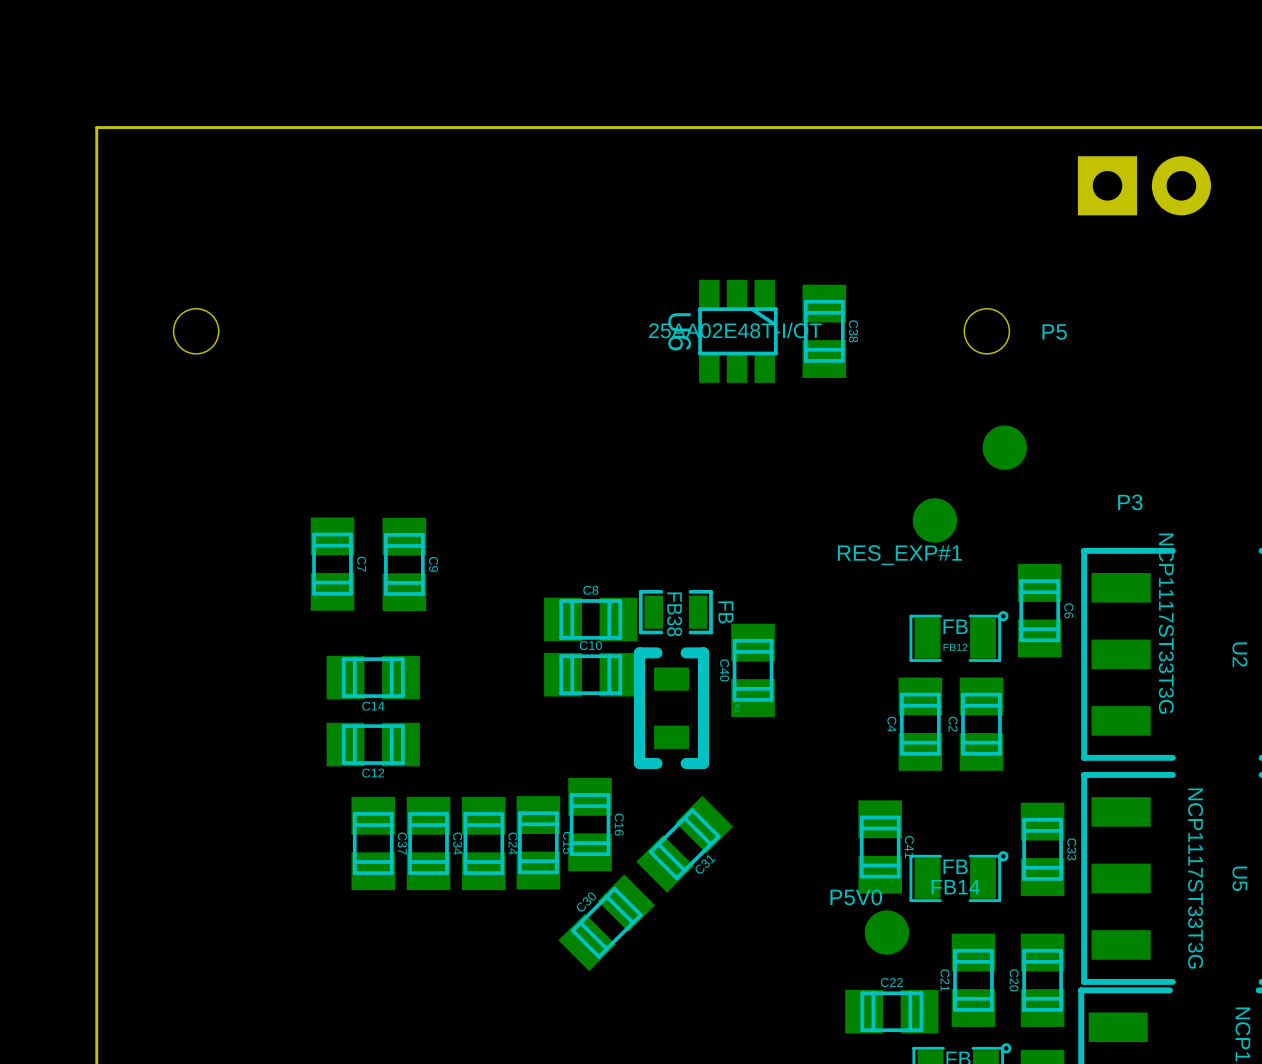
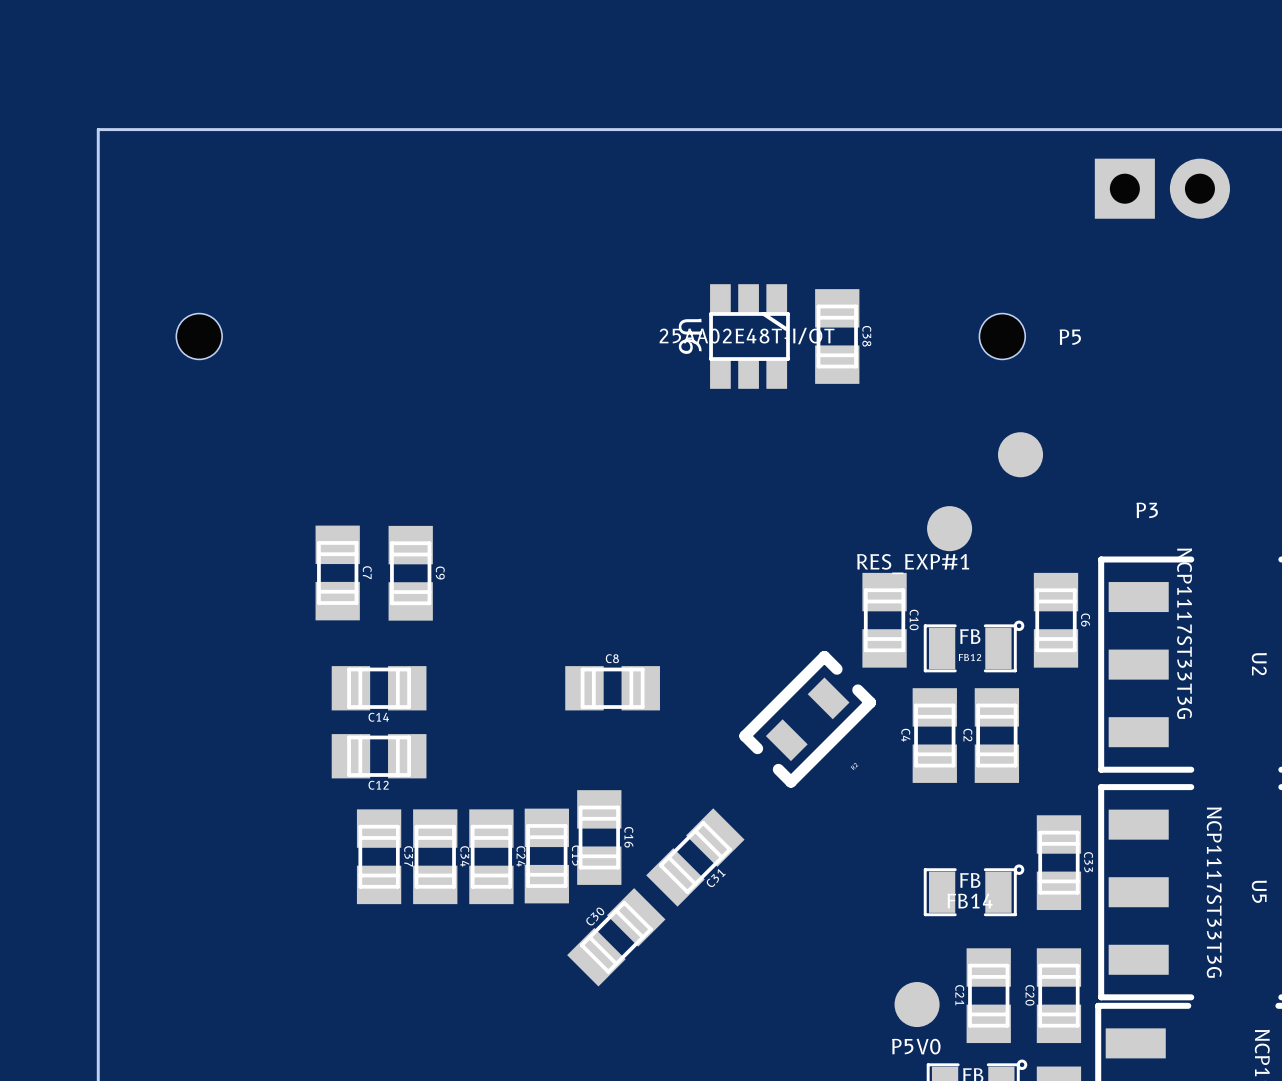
FB38: FB (675, 612) -> none
C8 position: (590, 619) -> (612, 688)
C40: (753, 670) -> none
C10 rotation: 0° (590, 674) -> 90° clockwise (884, 620)
C10 position: (590, 674) -> (884, 620)
part rotation: 0° (671, 708) -> 45° clockwise (807, 719)
part position: (671, 708) -> (807, 719)
C41: (880, 847) -> none
P5V0 name position: P5V0 (856, 897) -> P5V0 (916, 1046)
P5V0 position: (886, 932) -> (917, 1004)
C22: (891, 1011) -> none

